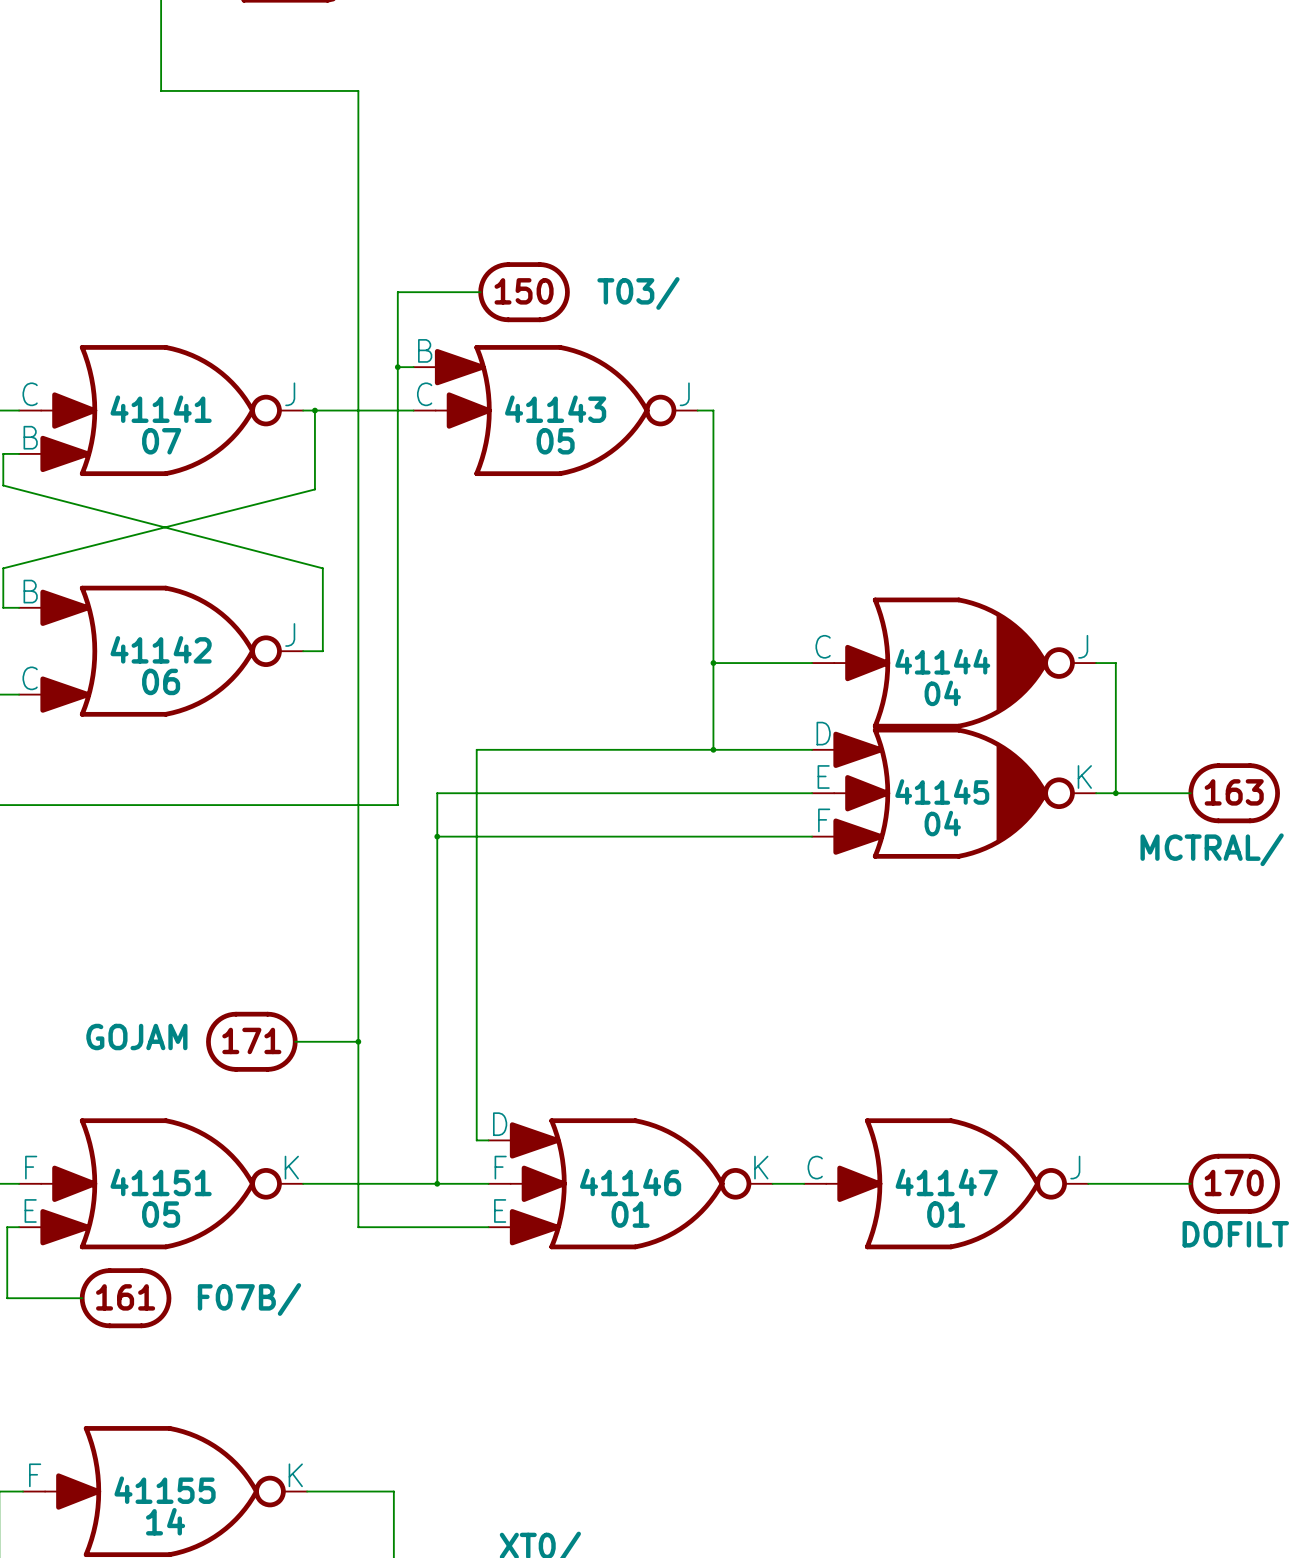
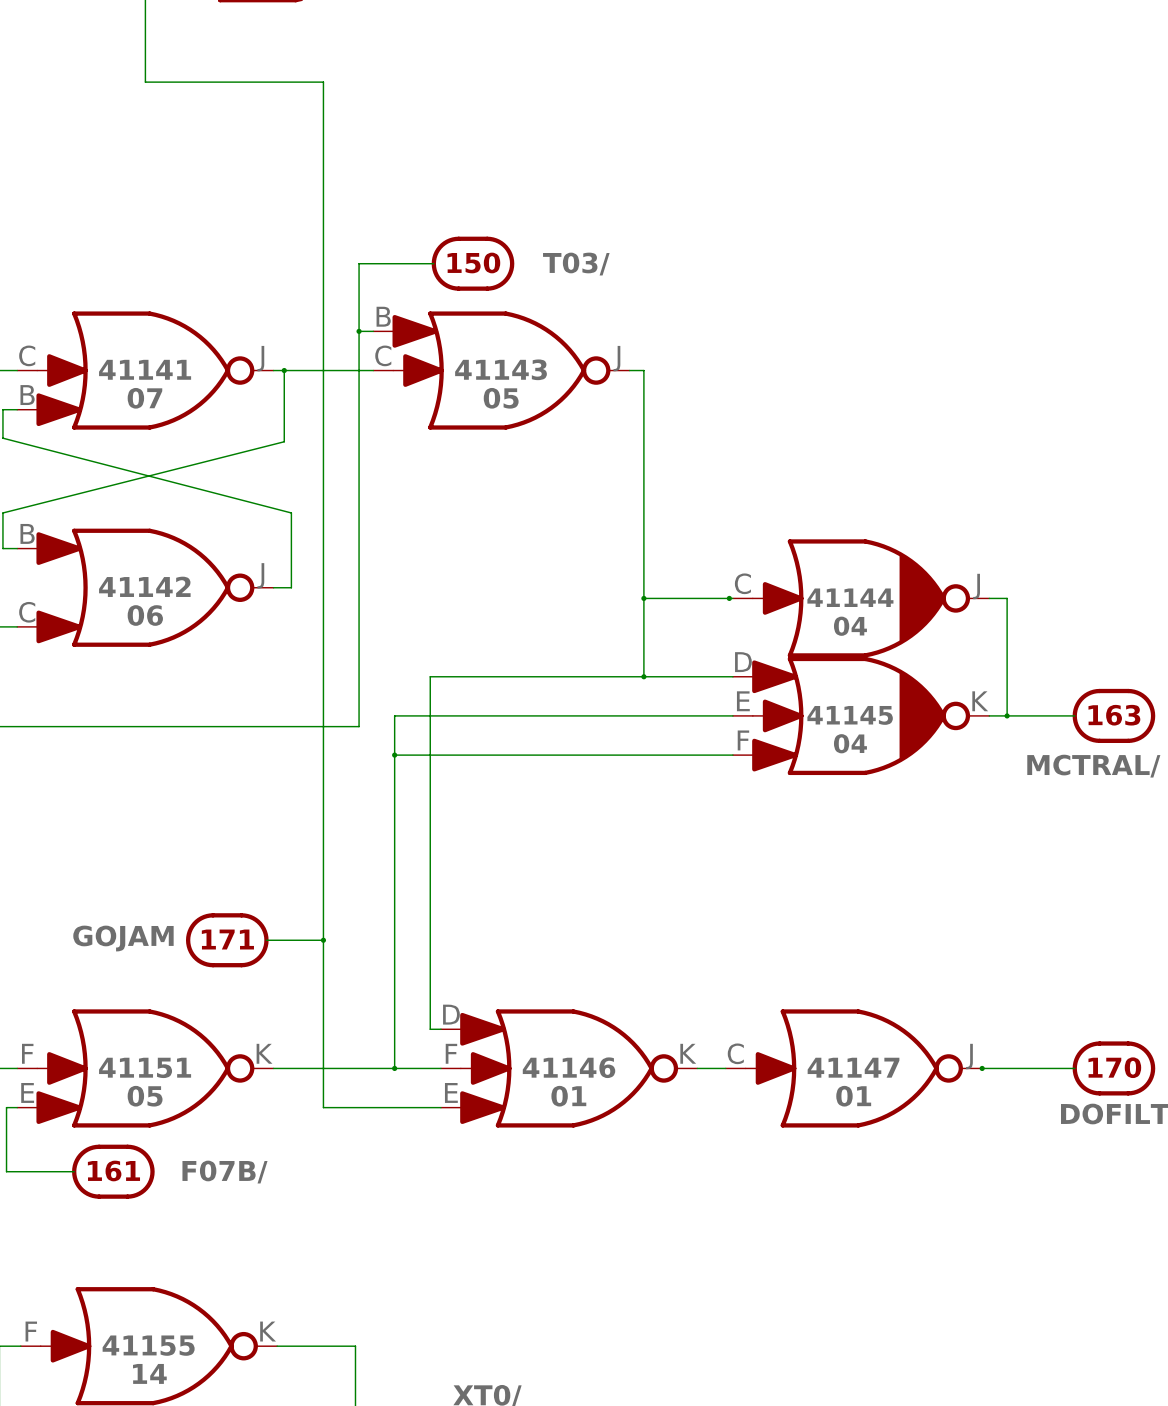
junction: none -> (729, 598)
junction: none -> (982, 1068)

